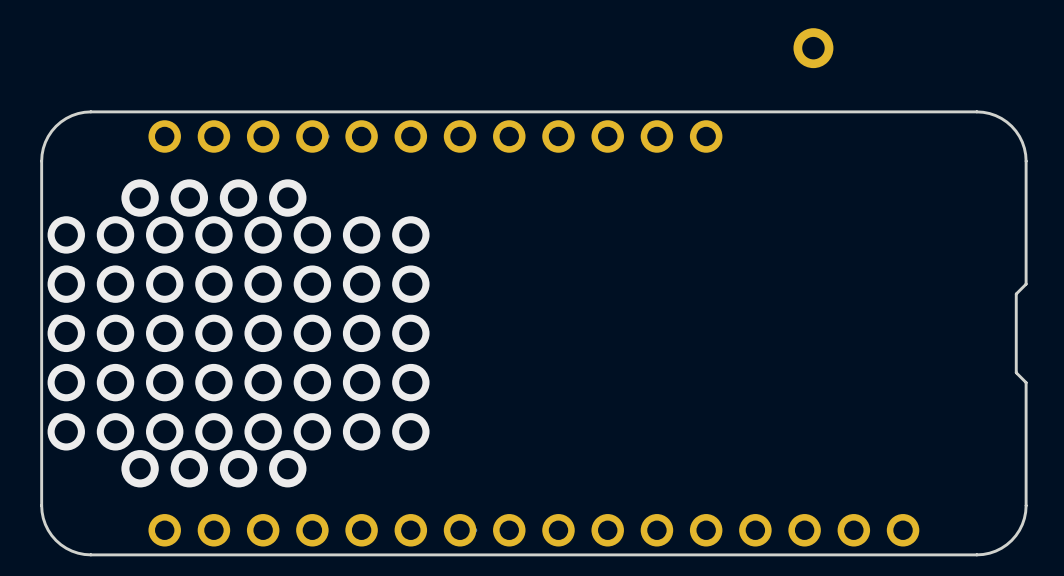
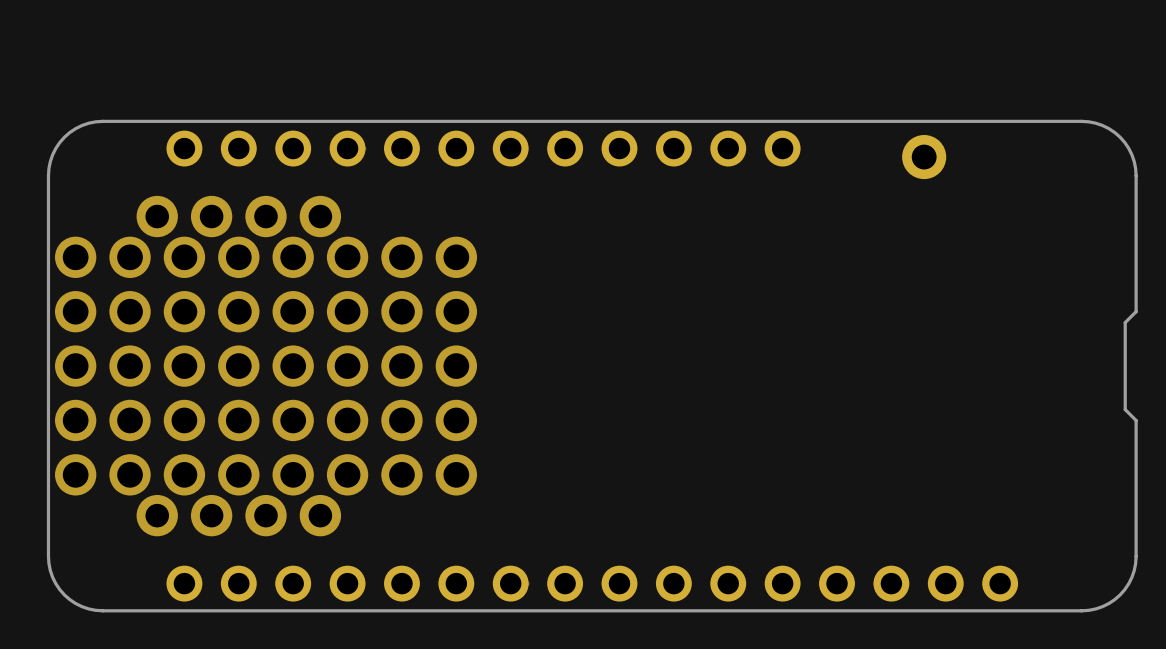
part position: (813, 48) -> (924, 157)

